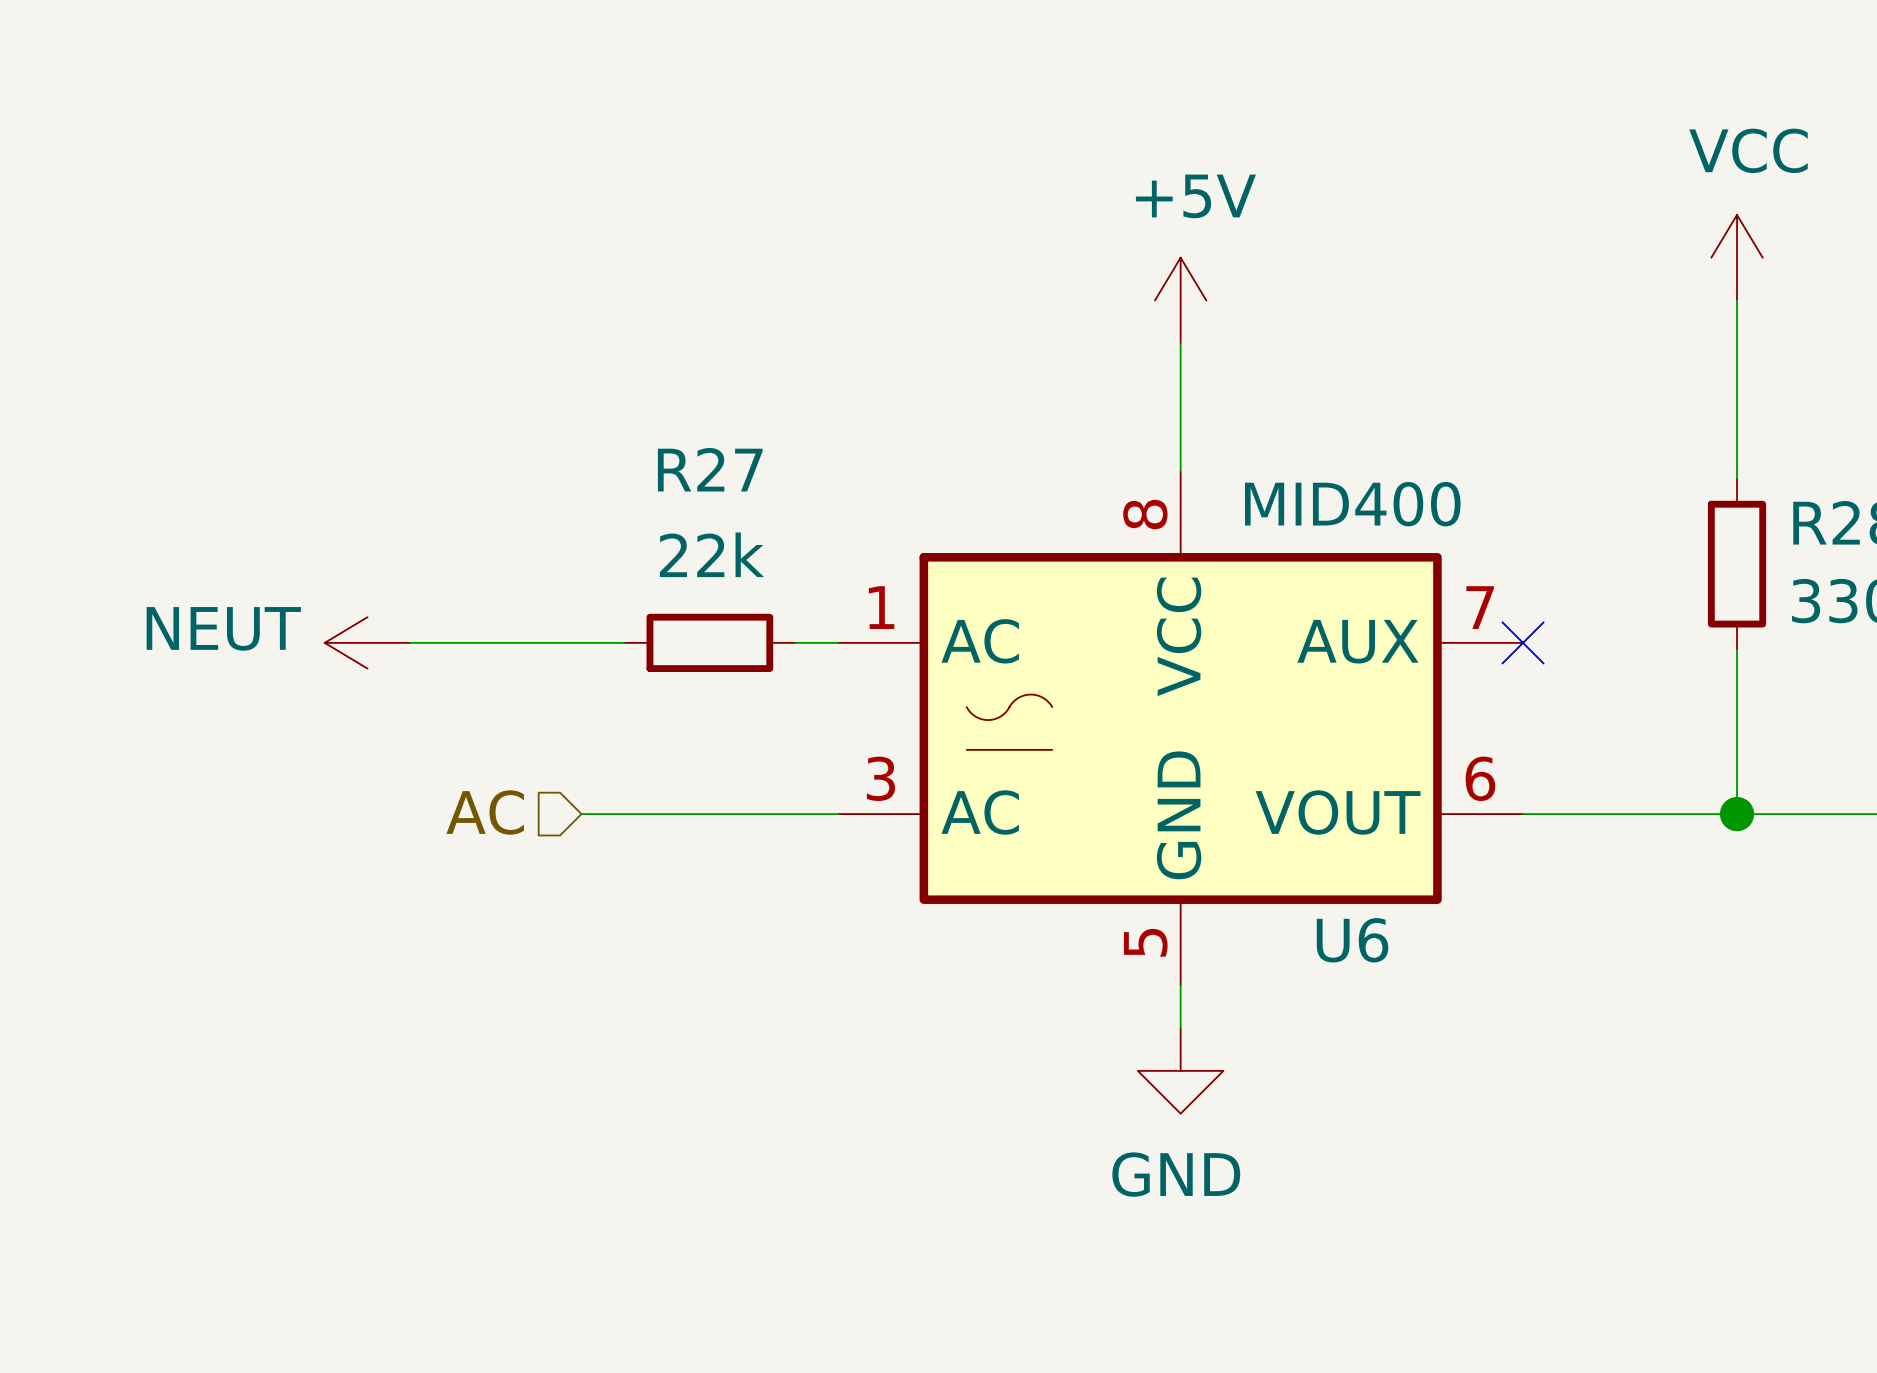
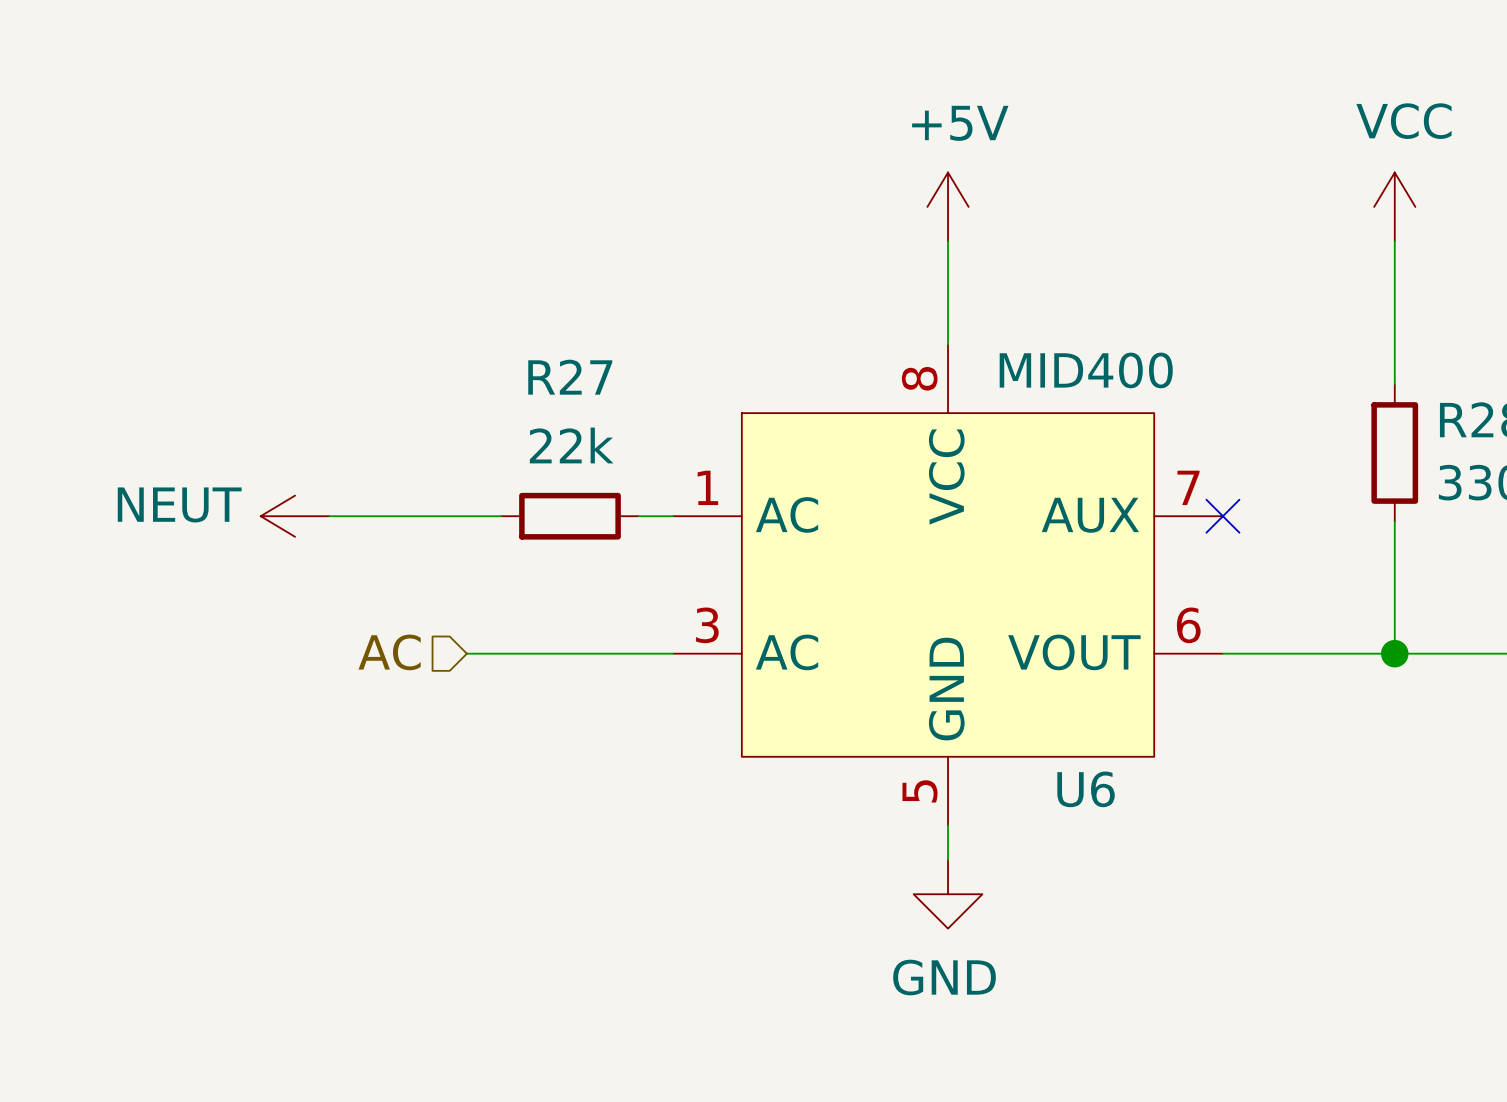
power symbol position: +5V (1180, 300) -> +5V (948, 206)
U6 symbol: [838, 471, 1524, 986] -> [673, 344, 1223, 826]
power symbol position: GND (1180, 1070) -> GND (948, 894)

